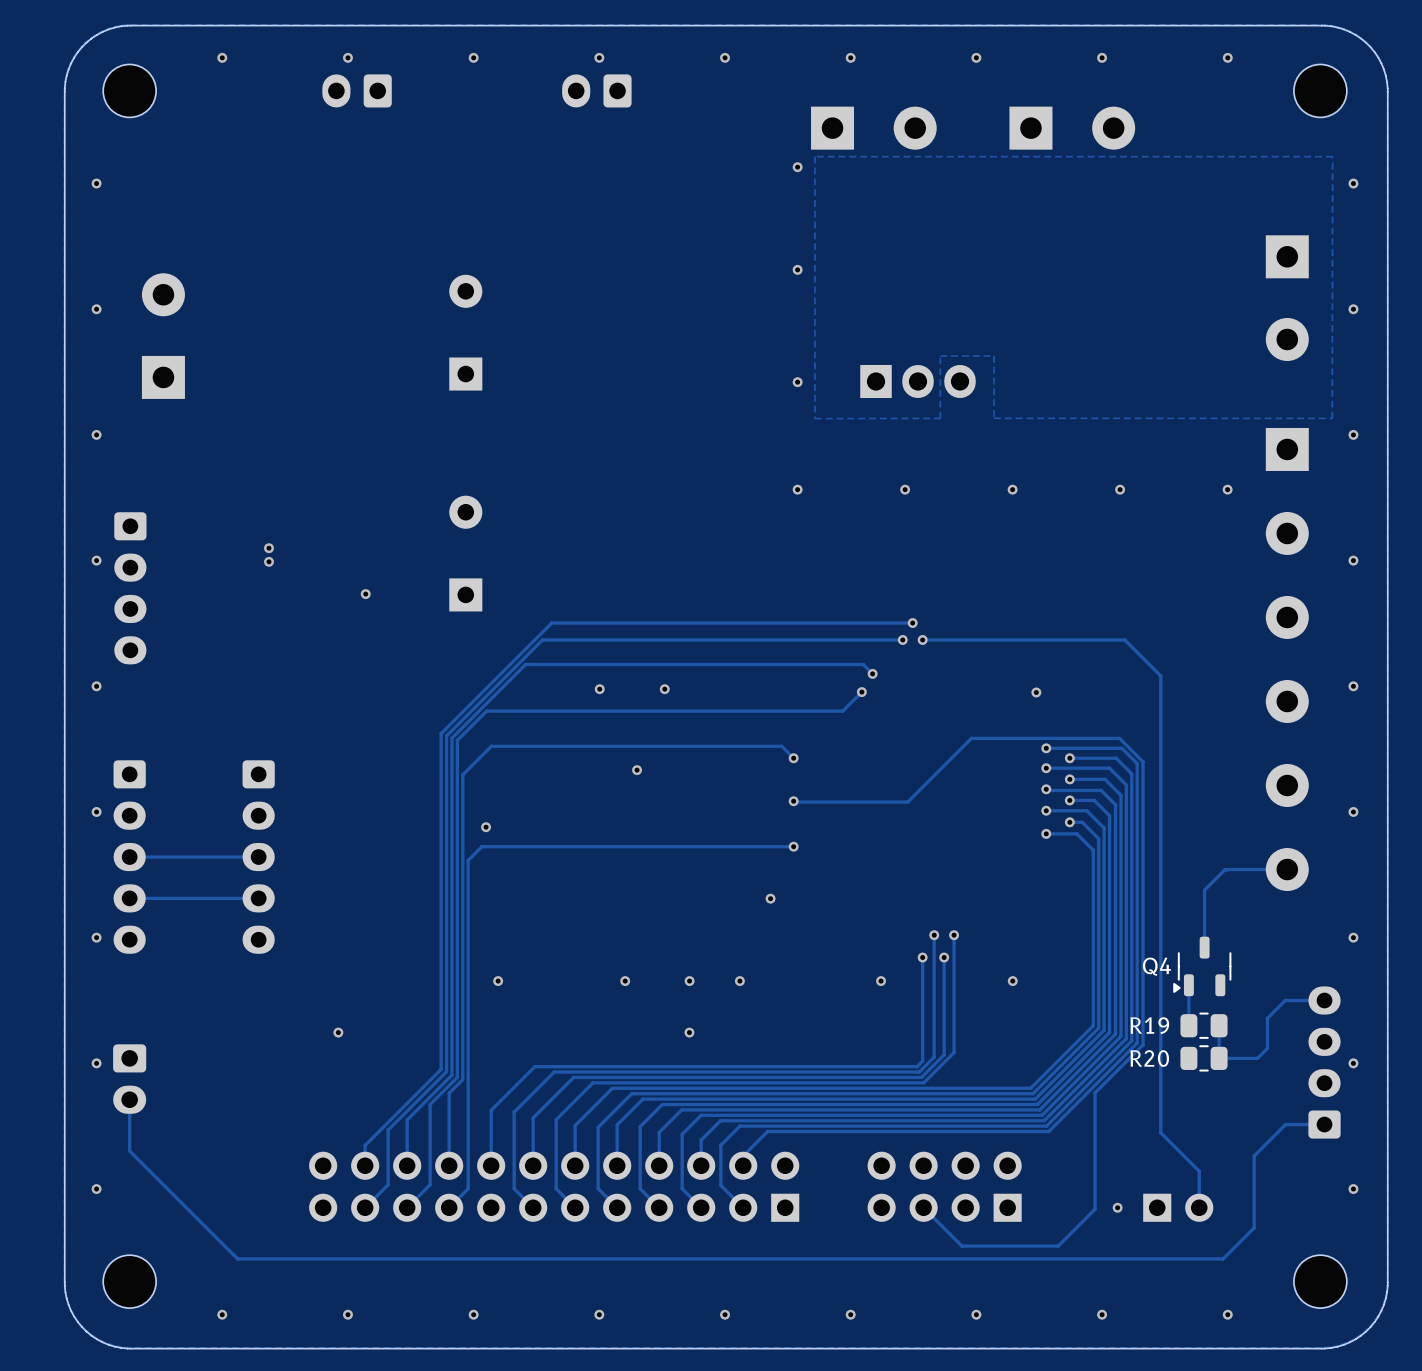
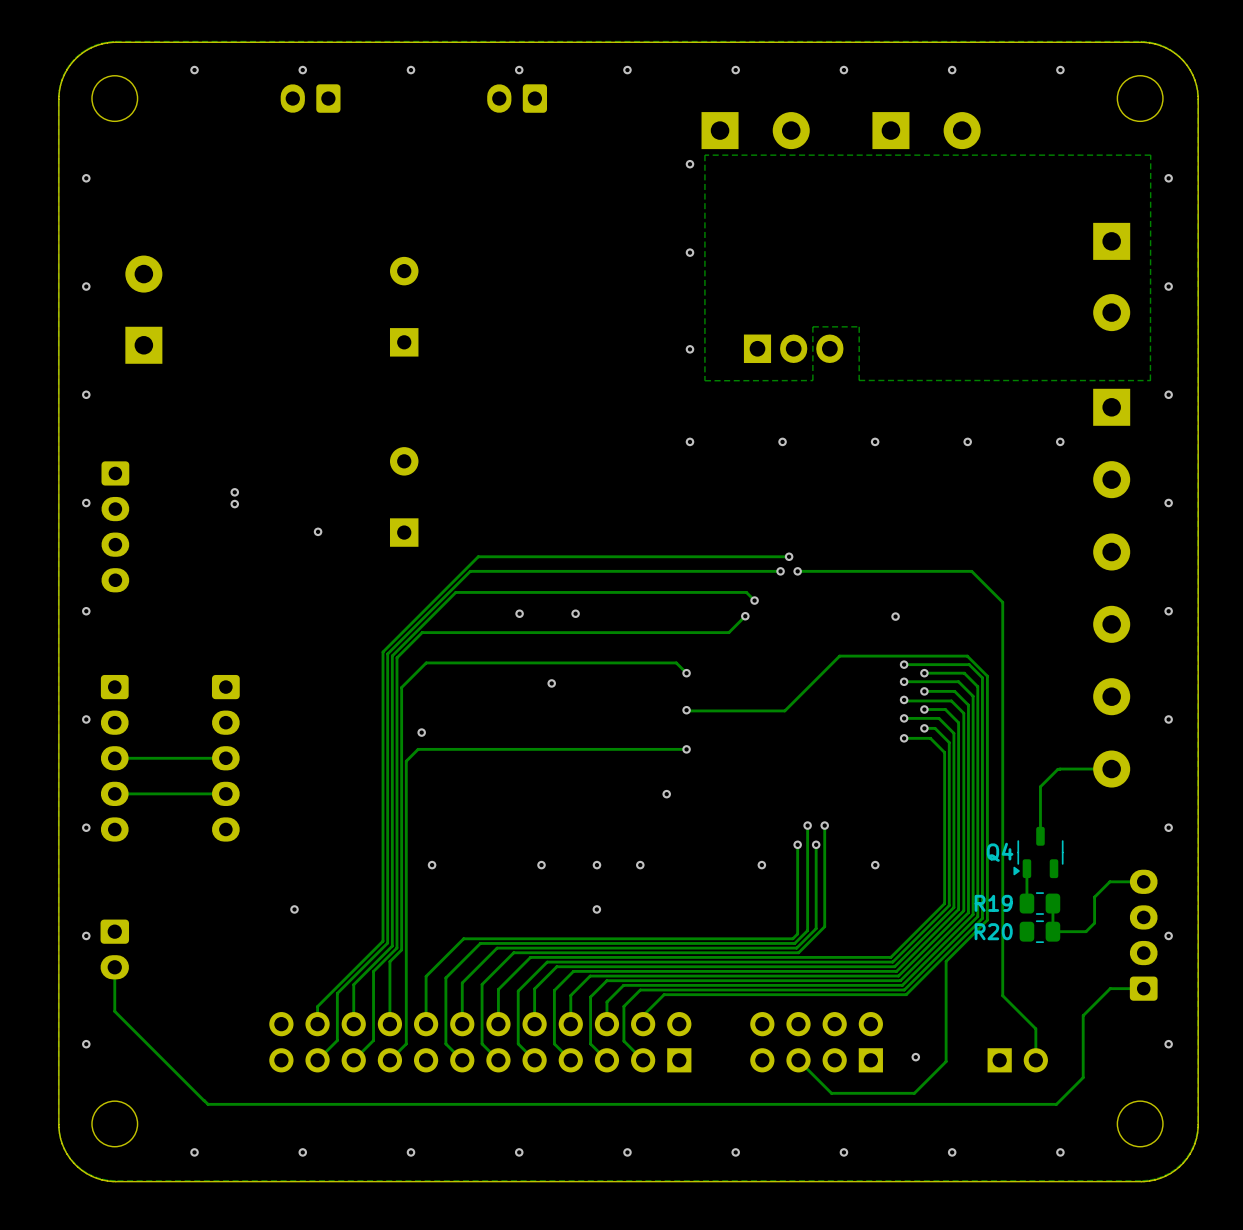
via position: (1117, 1207) -> (915, 1057)

